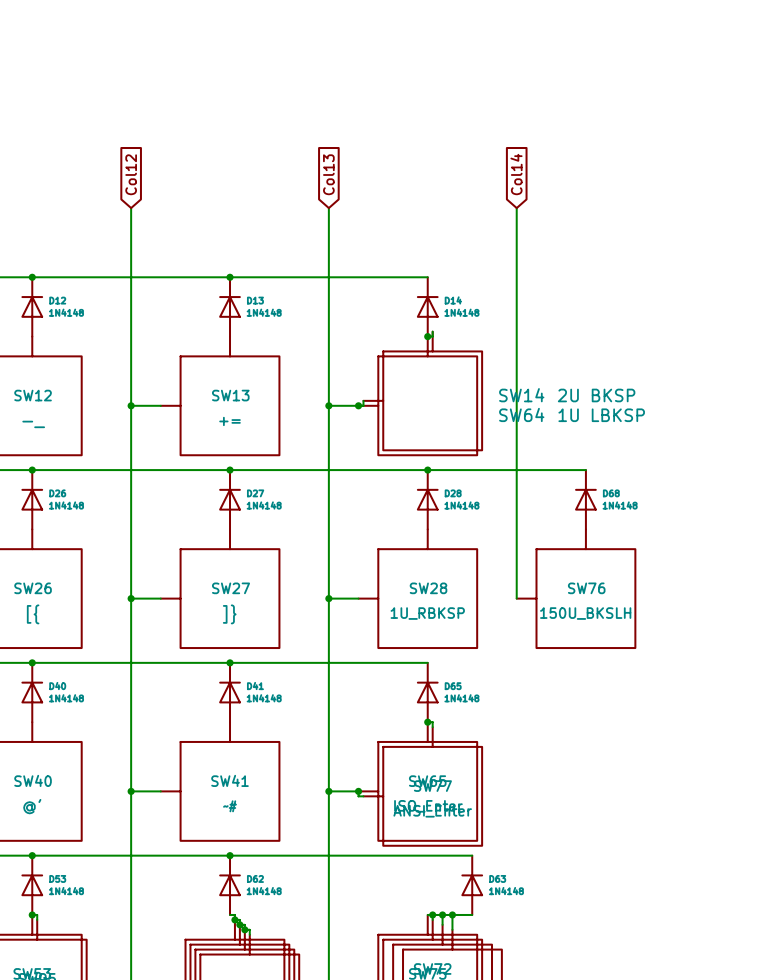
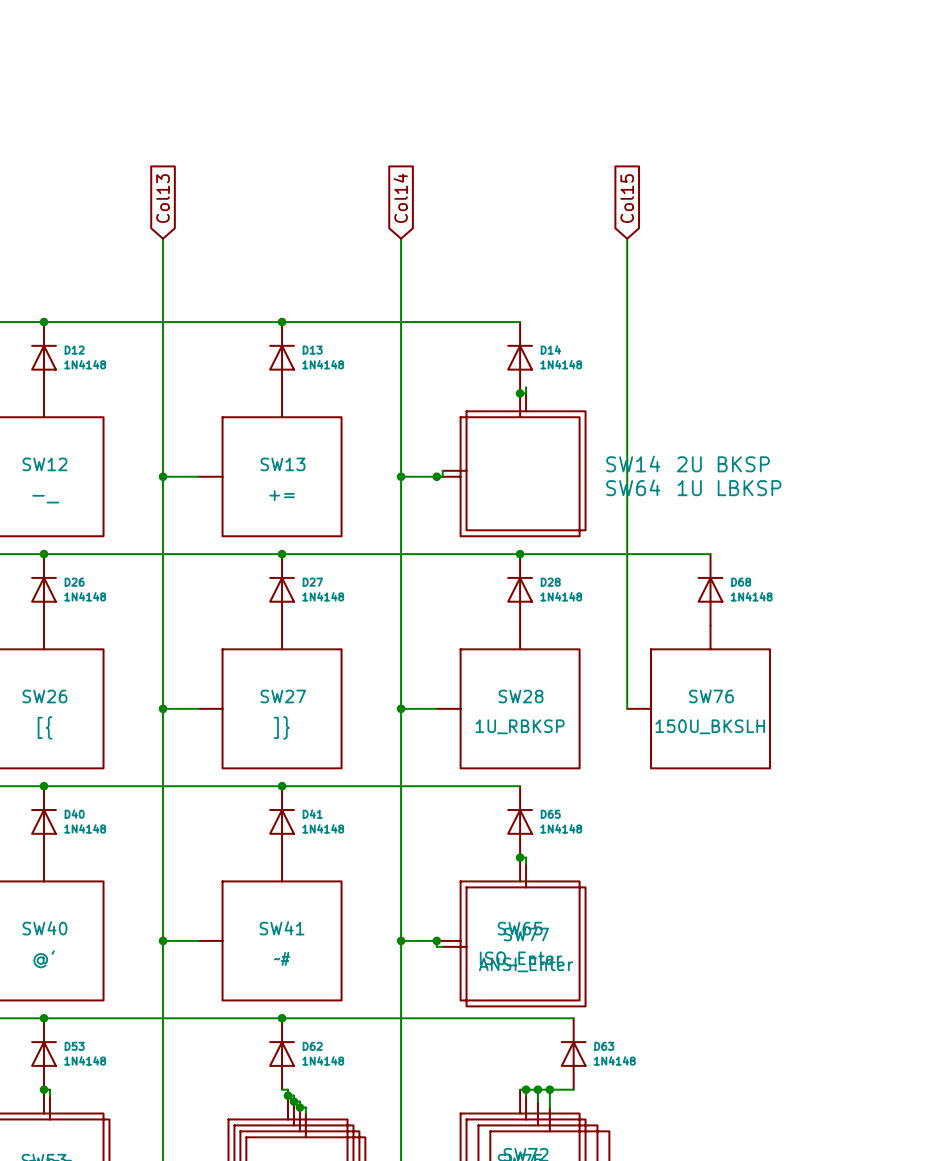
global label: Col12 (131, 174) -> Col13 (163, 198)
global label: Col13 (328, 174) -> Col14 (400, 198)
global label: Col14 (516, 174) -> Col15 (627, 198)

